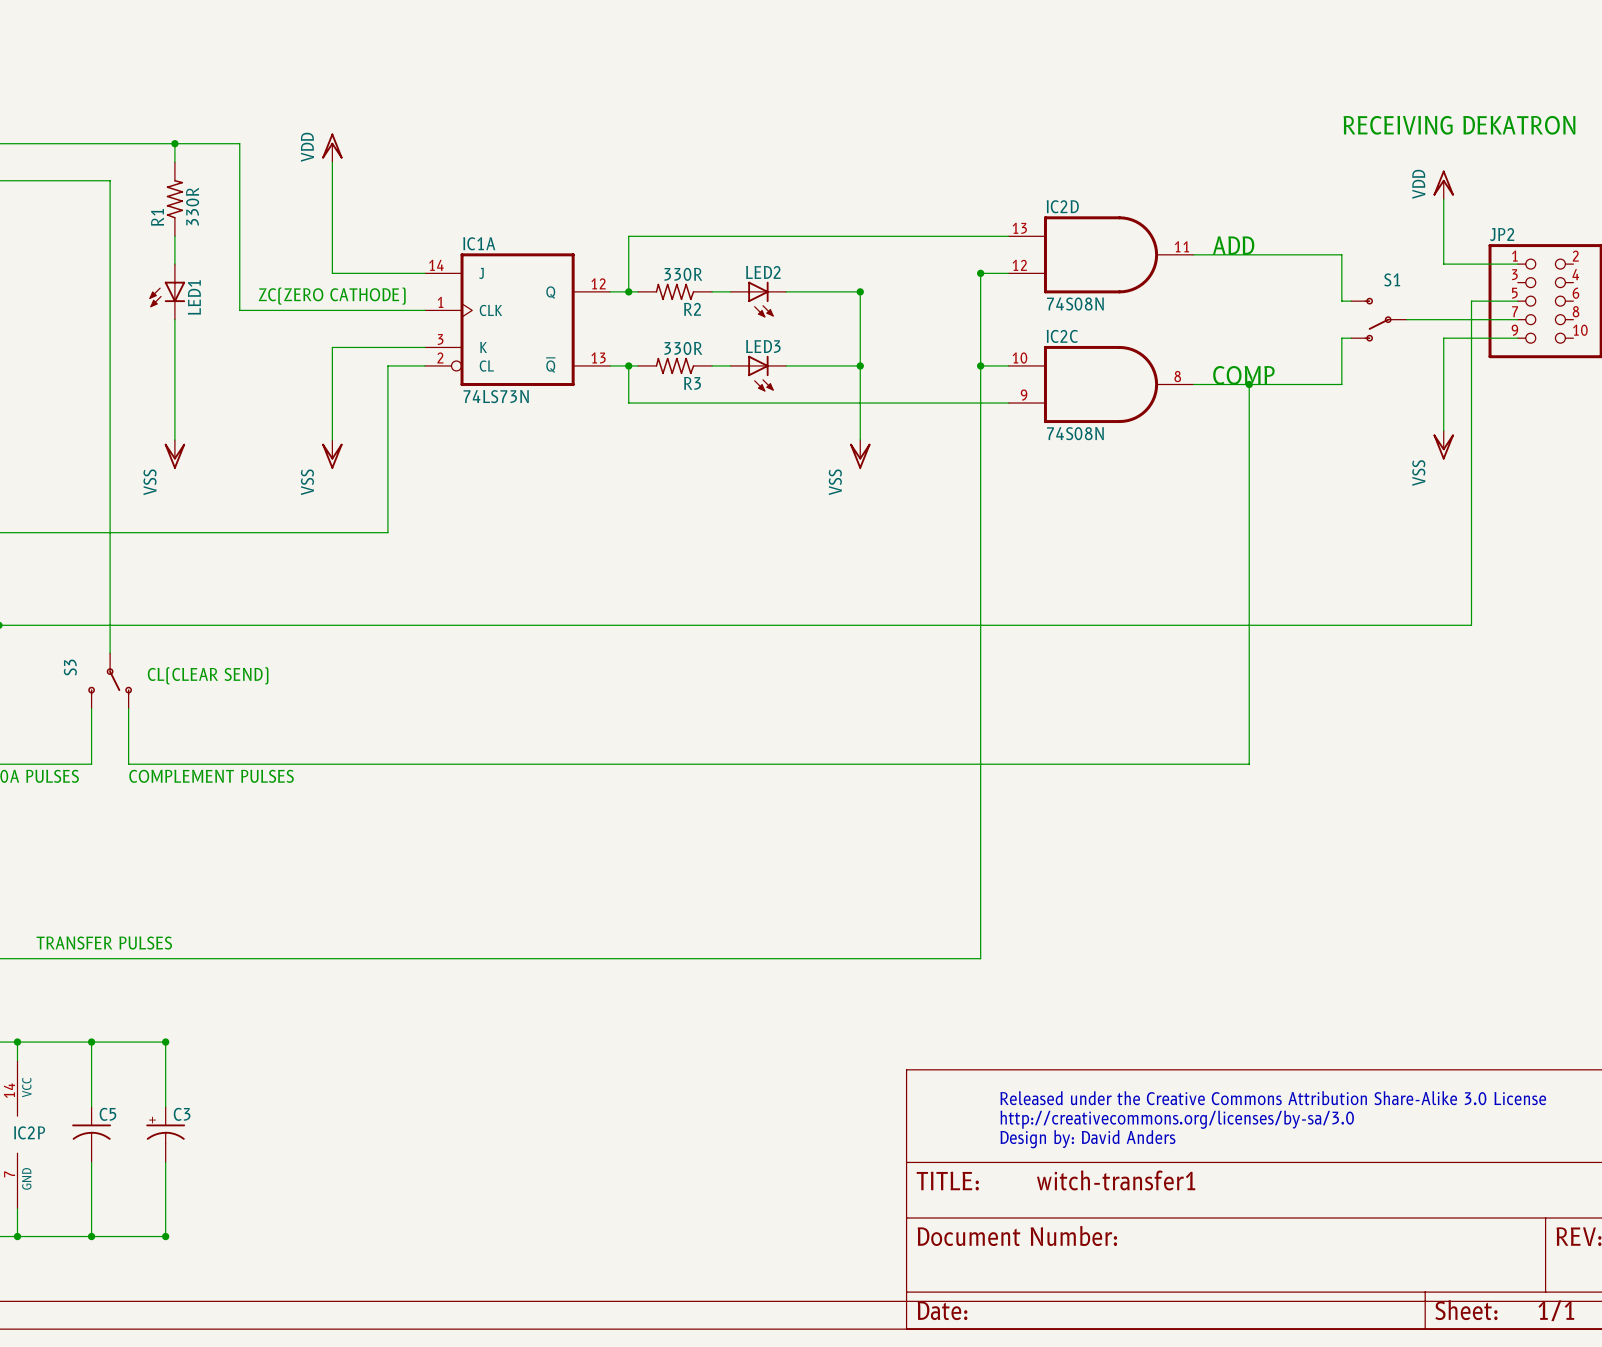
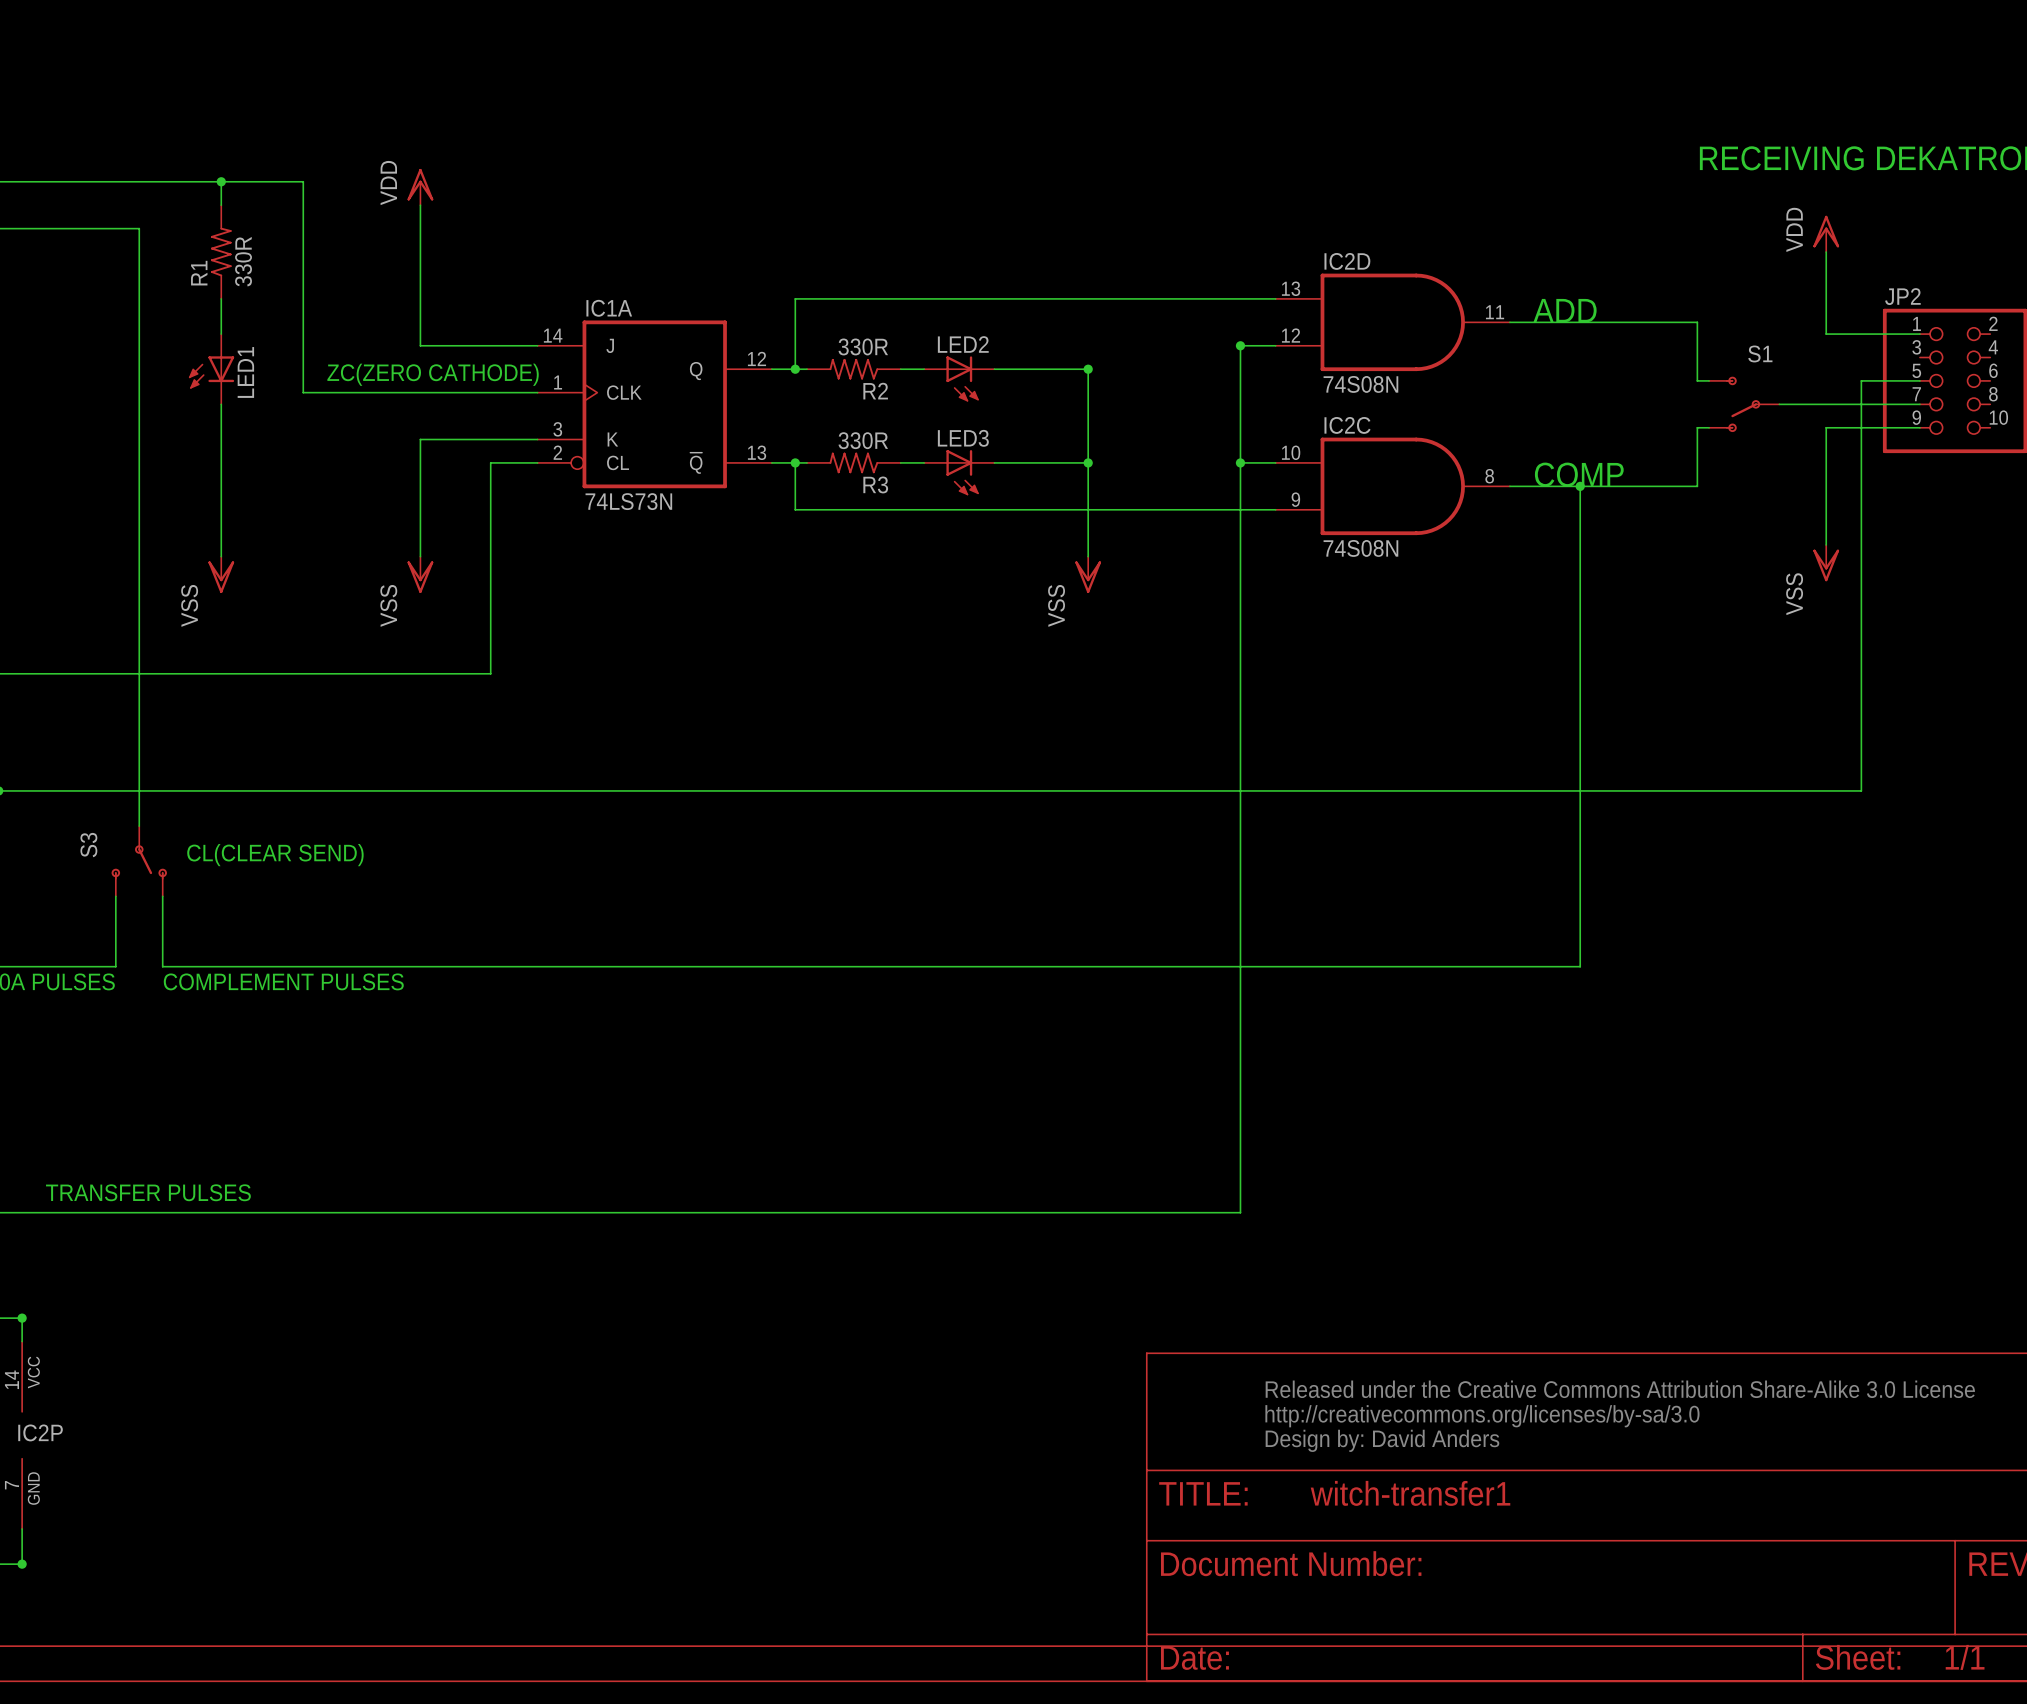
wire: (17, 1042) (165, 1042) (165, 1106) -> none
wire: (91, 1042) (91, 1106) -> none
junction: (91, 1042) -> none
junction: (165, 1042) -> none
C5: (91, 1134) -> none
C3: (165, 1134) -> none
wire: (91, 1162) (91, 1236) -> none
wire: (165, 1162) (165, 1236) (17, 1236) -> none
junction: (91, 1236) -> none
junction: (165, 1236) -> none

